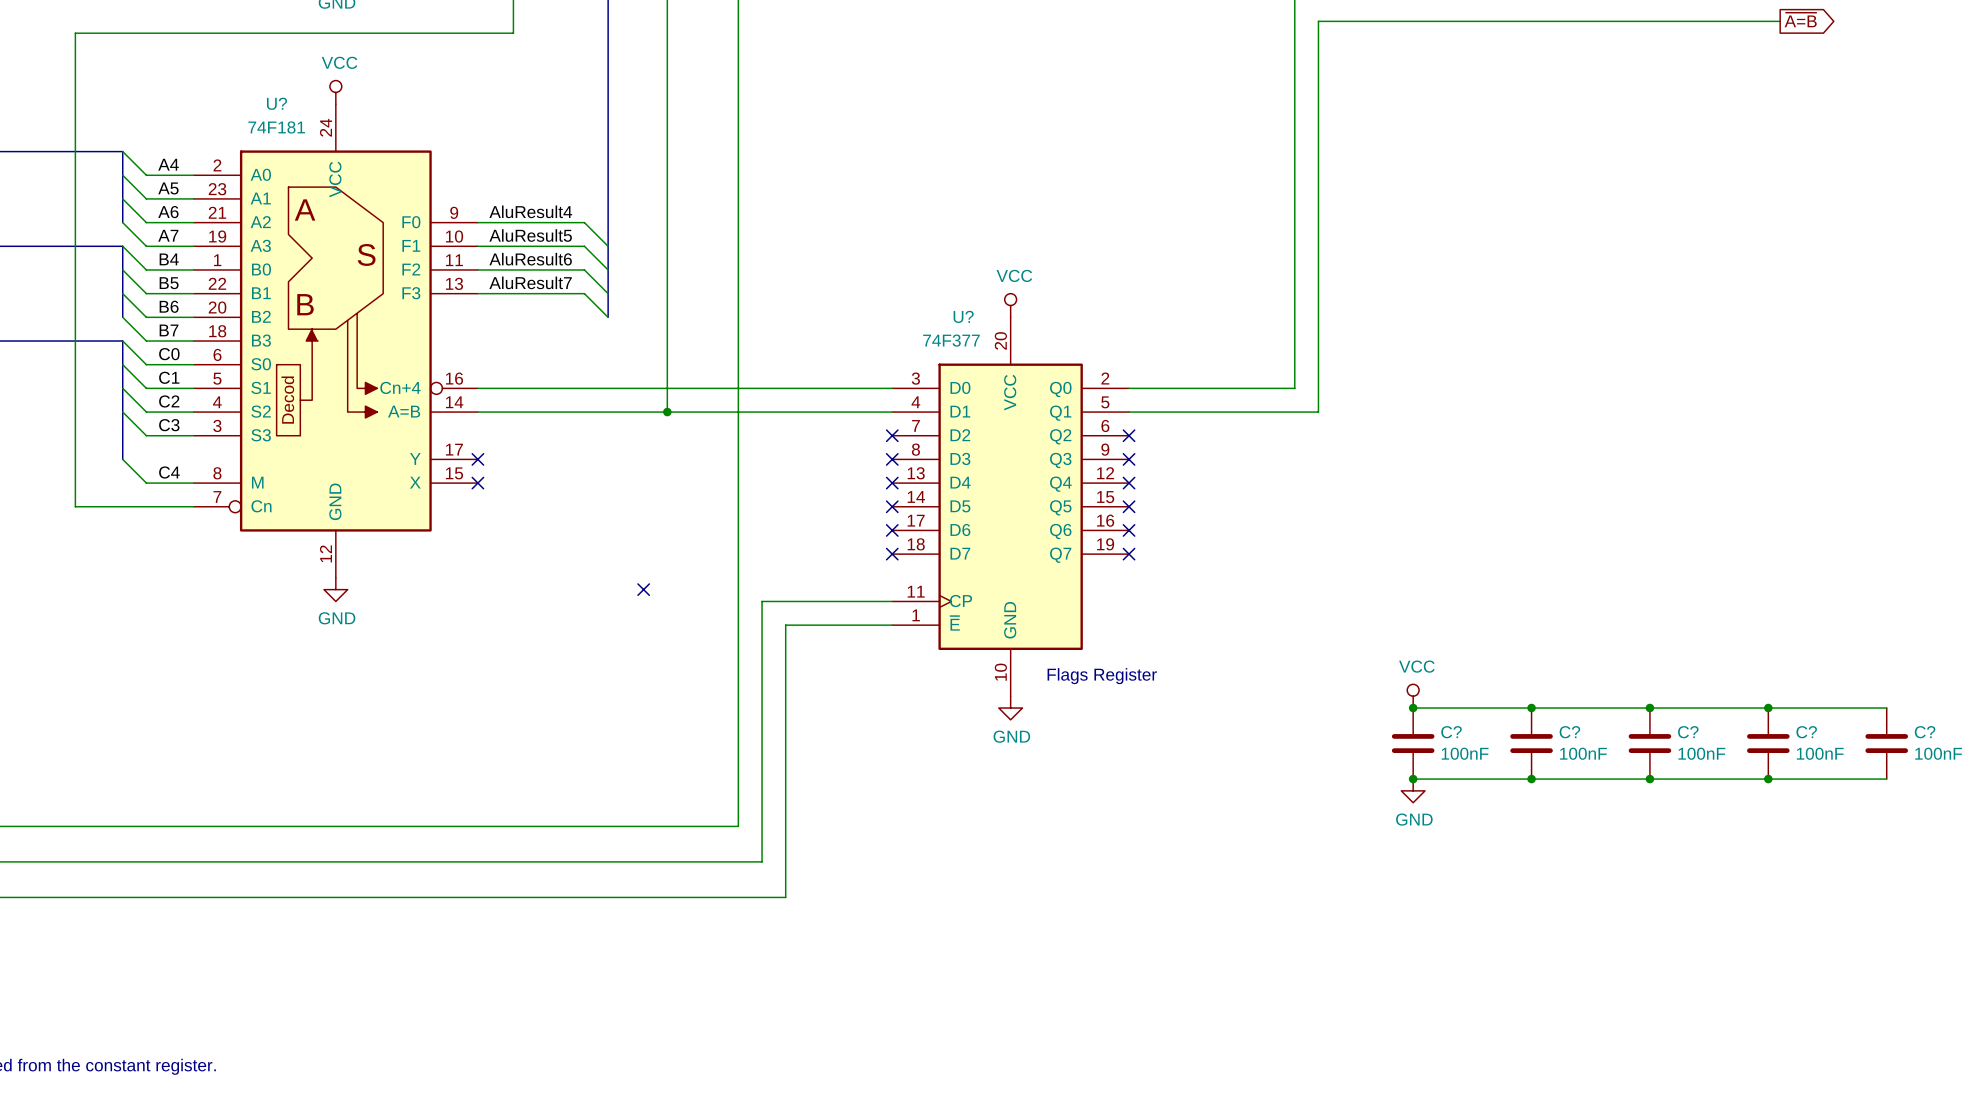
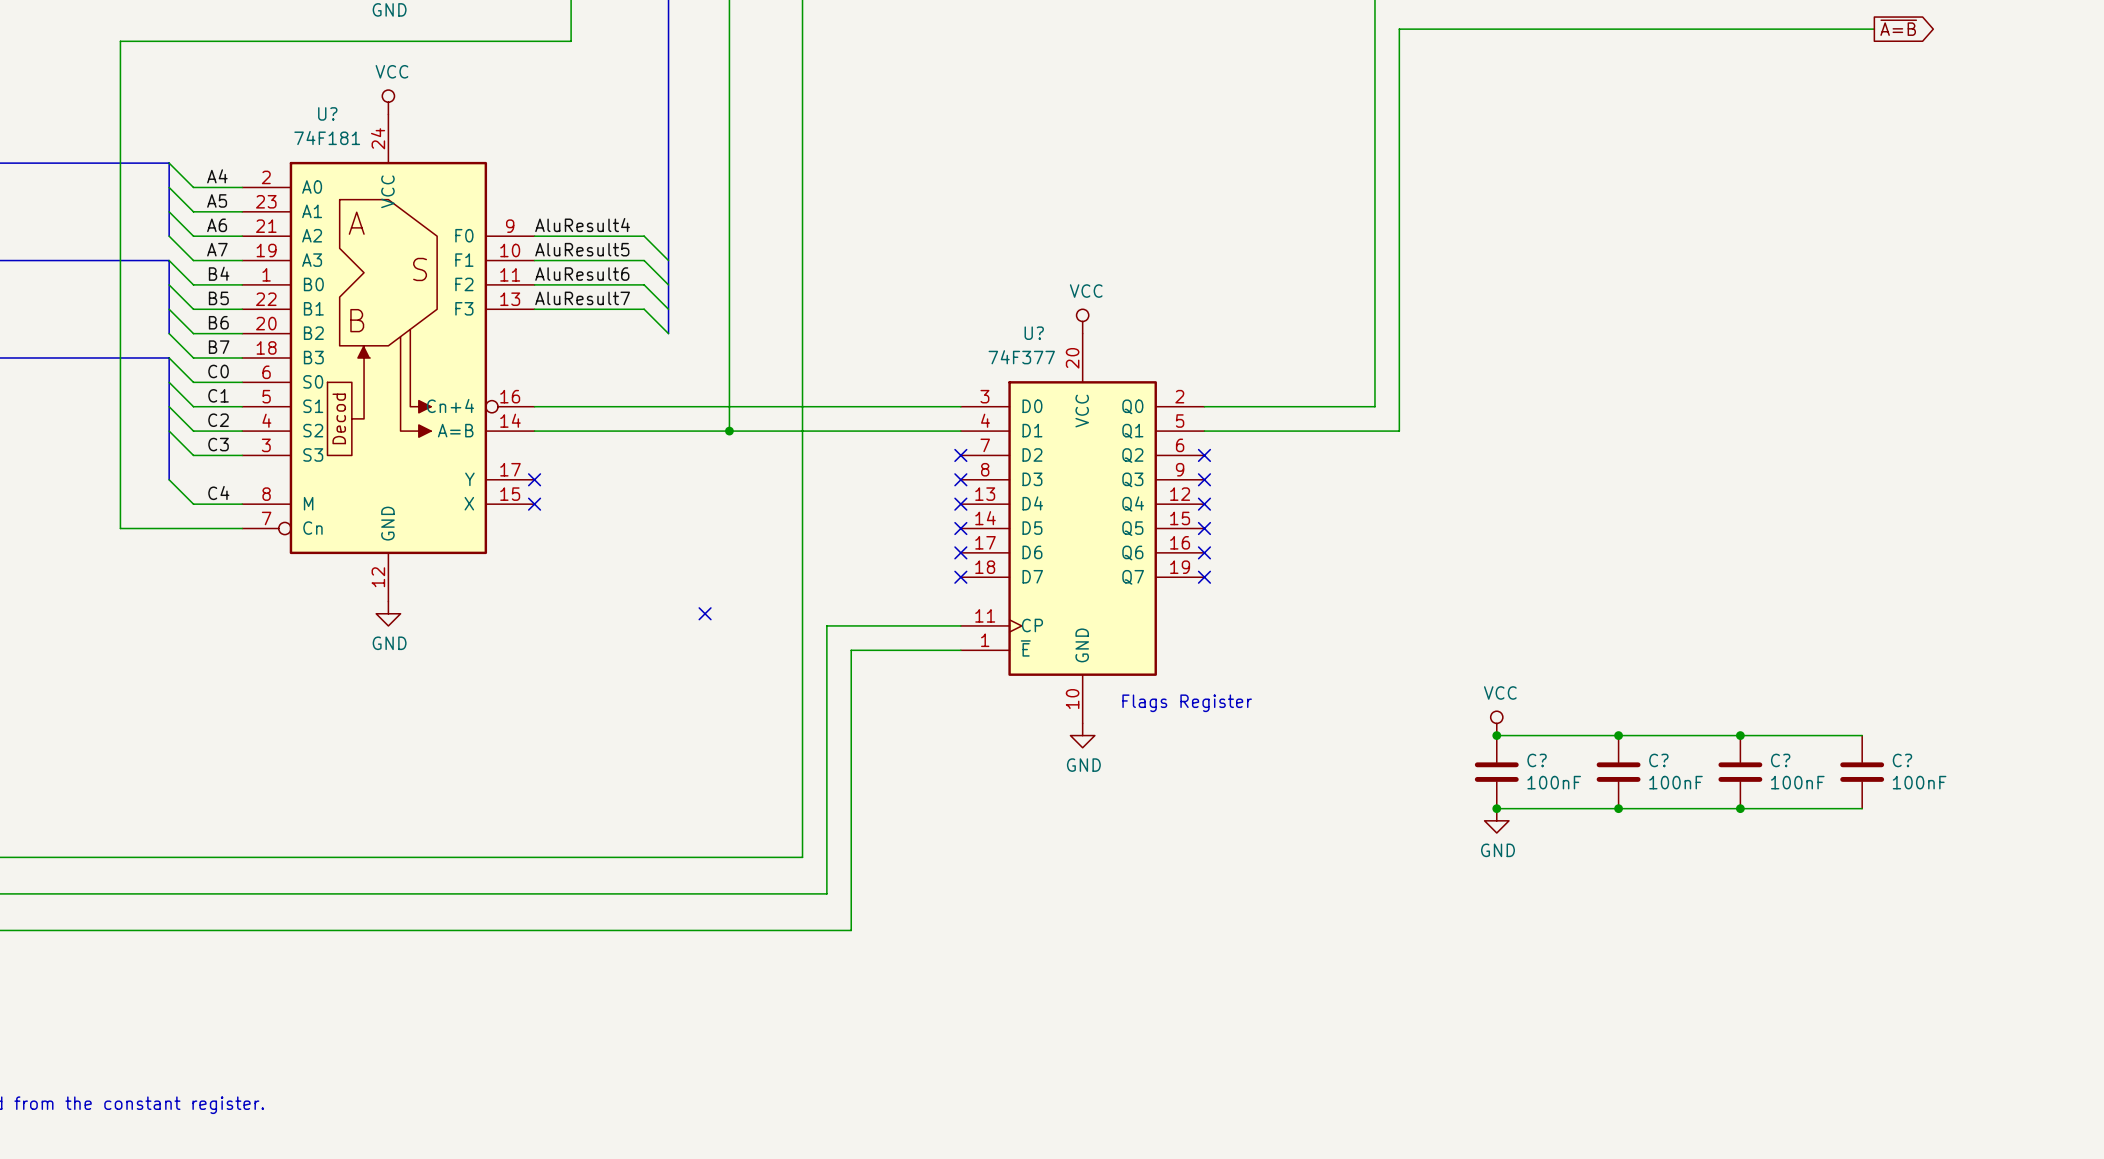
wire: (1768, 708) (1886, 708) -> none
junction: (1768, 708) -> none
C?: 100nF (1886, 743) -> none
wire: (1768, 779) (1886, 779) -> none
junction: (1768, 779) -> none

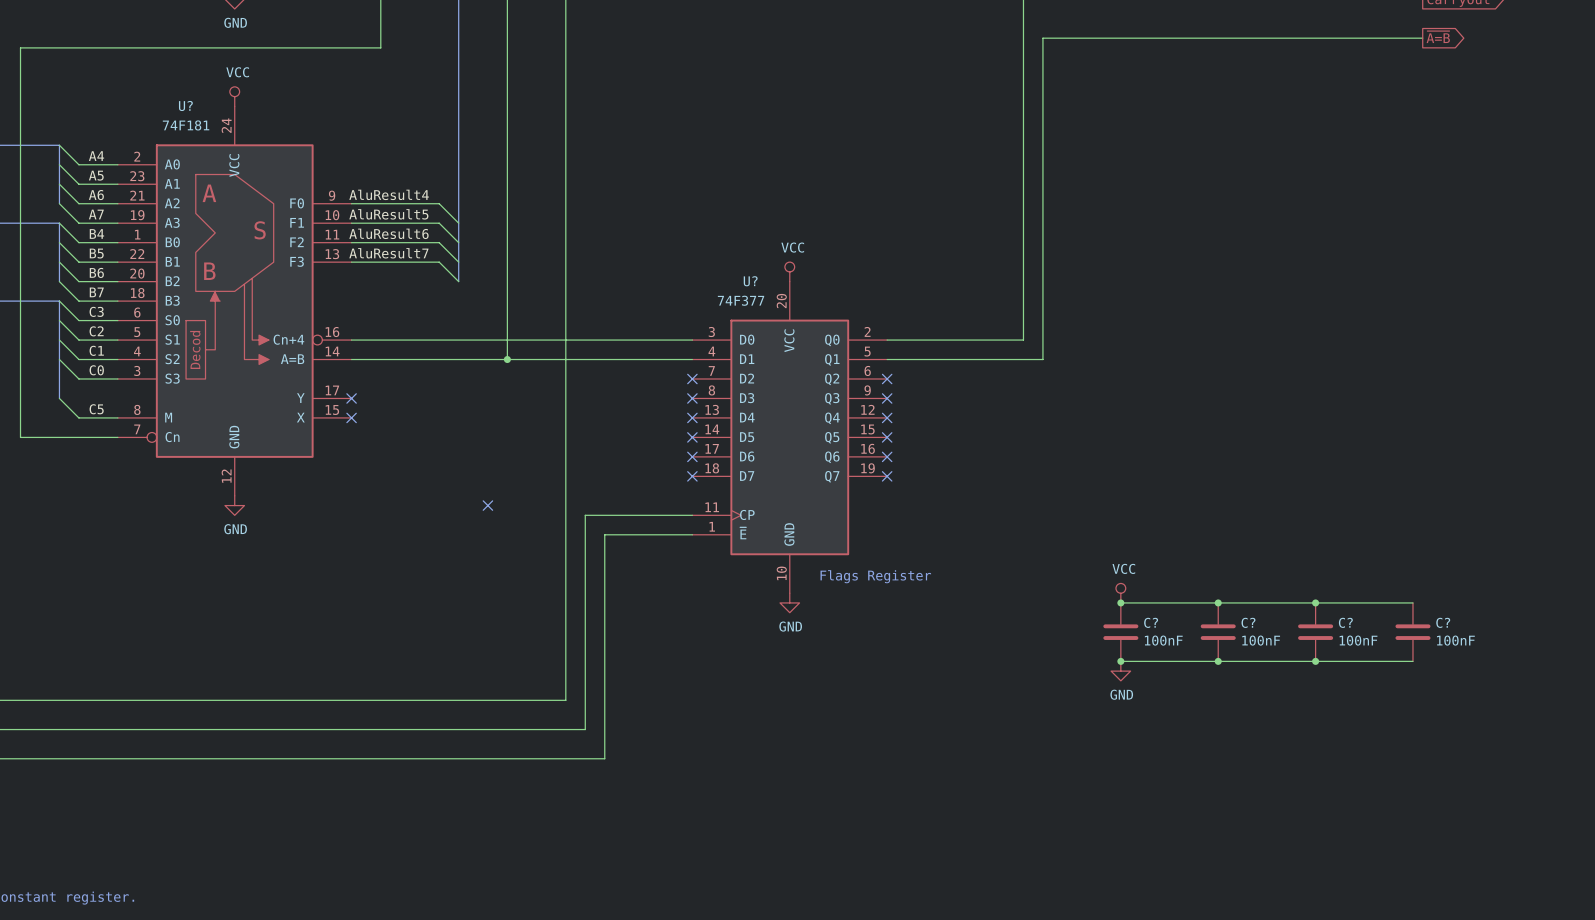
label: C0 (218, 371) -> C3 (96, 311)
label: C1 (218, 395) -> C2 (96, 331)
label: C2 (218, 420) -> C1 (96, 350)
label: C3 (218, 444) -> C0 (96, 370)
label: C4 (218, 492) -> C5 (96, 409)

